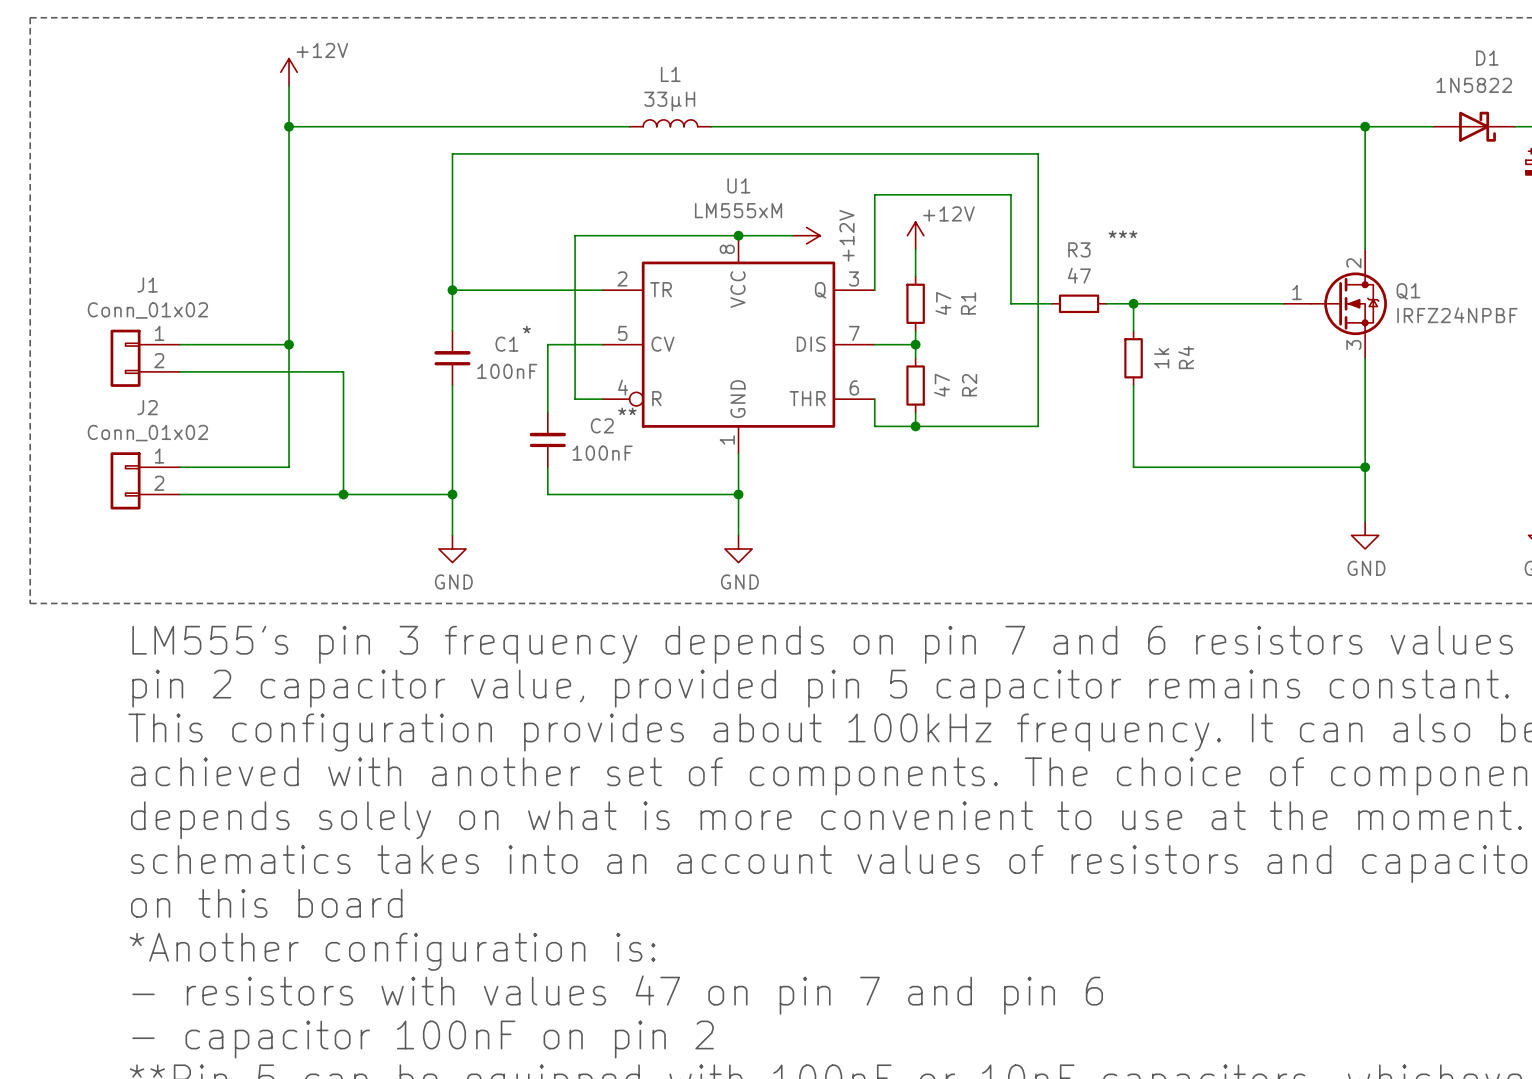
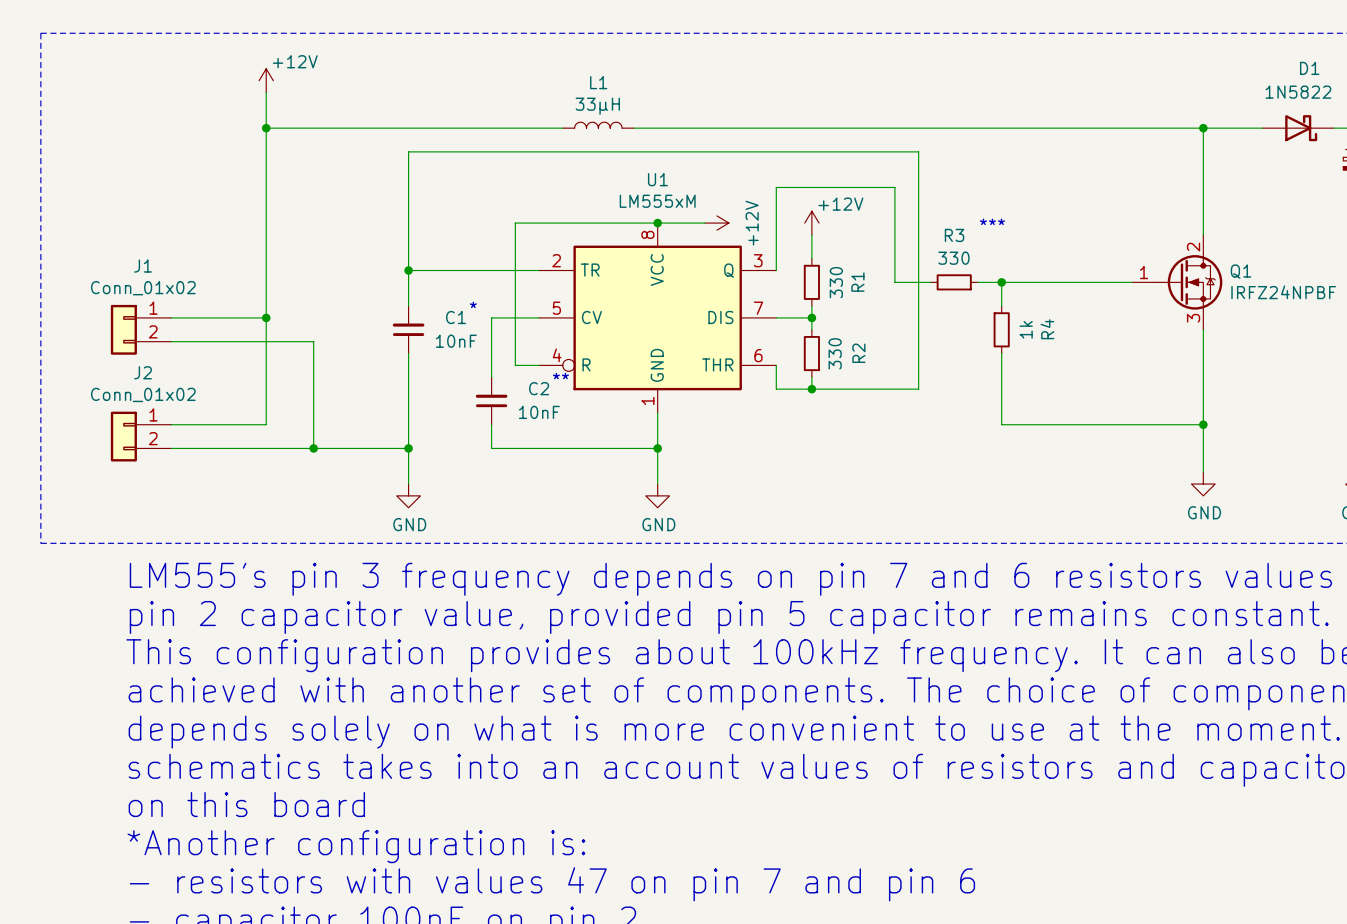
R3 value: 47 (1079, 275) -> 330 (953, 258)
R1 value: 47 (943, 303) -> 330 (836, 282)
C1 value: 100nF (507, 371) -> 10nF (456, 341)
R2 value: 47 (942, 385) -> 330 (835, 353)
C2 value: 100nF (602, 453) -> 10nF (539, 412)

